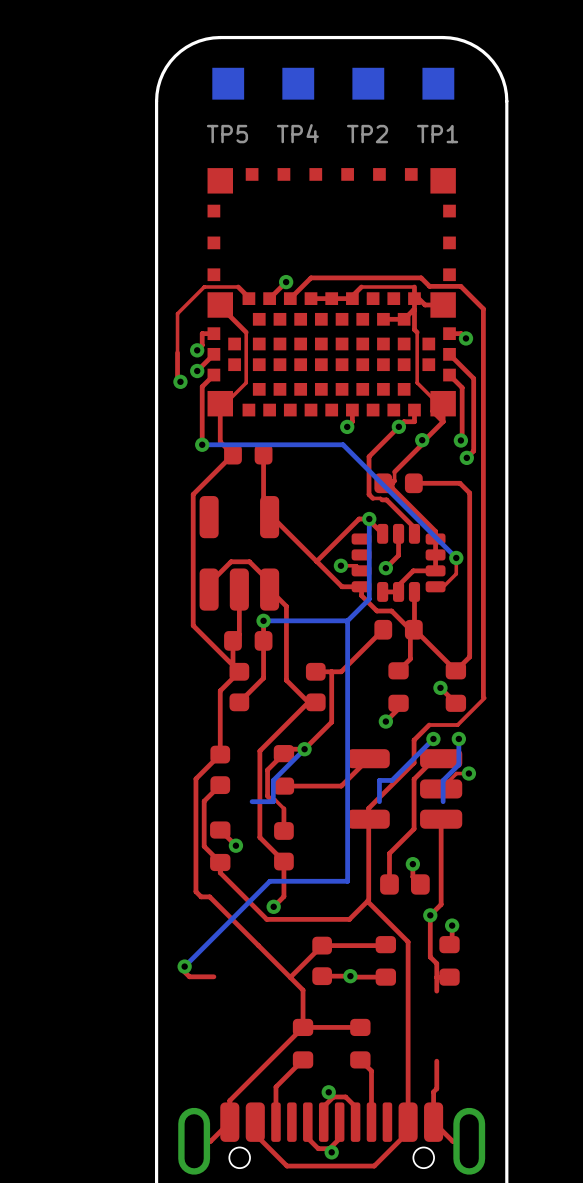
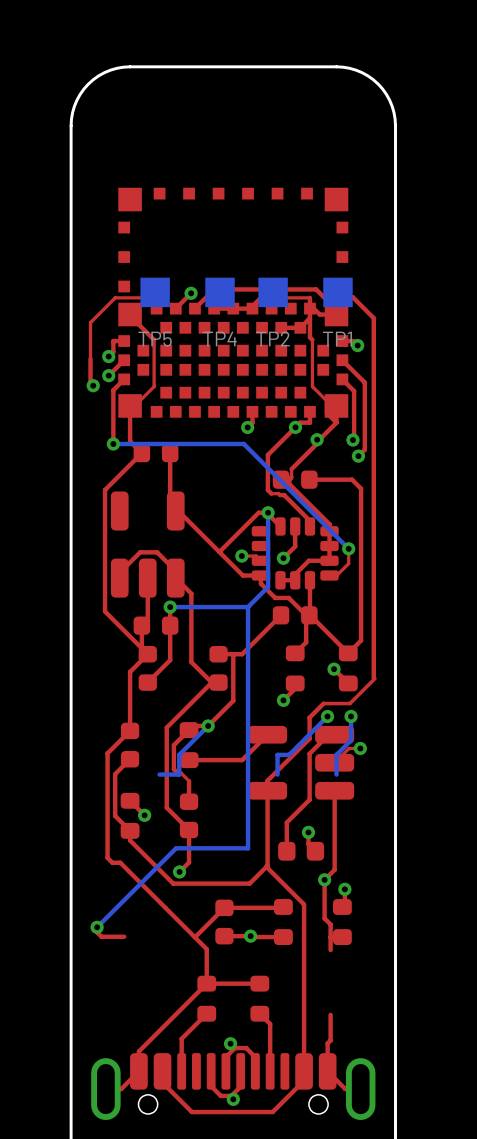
TP5 position: (228, 83) -> (155, 292)
TP4 position: (298, 83) -> (220, 292)
TP2 position: (368, 83) -> (273, 292)
TP1 position: (438, 83) -> (337, 292)

